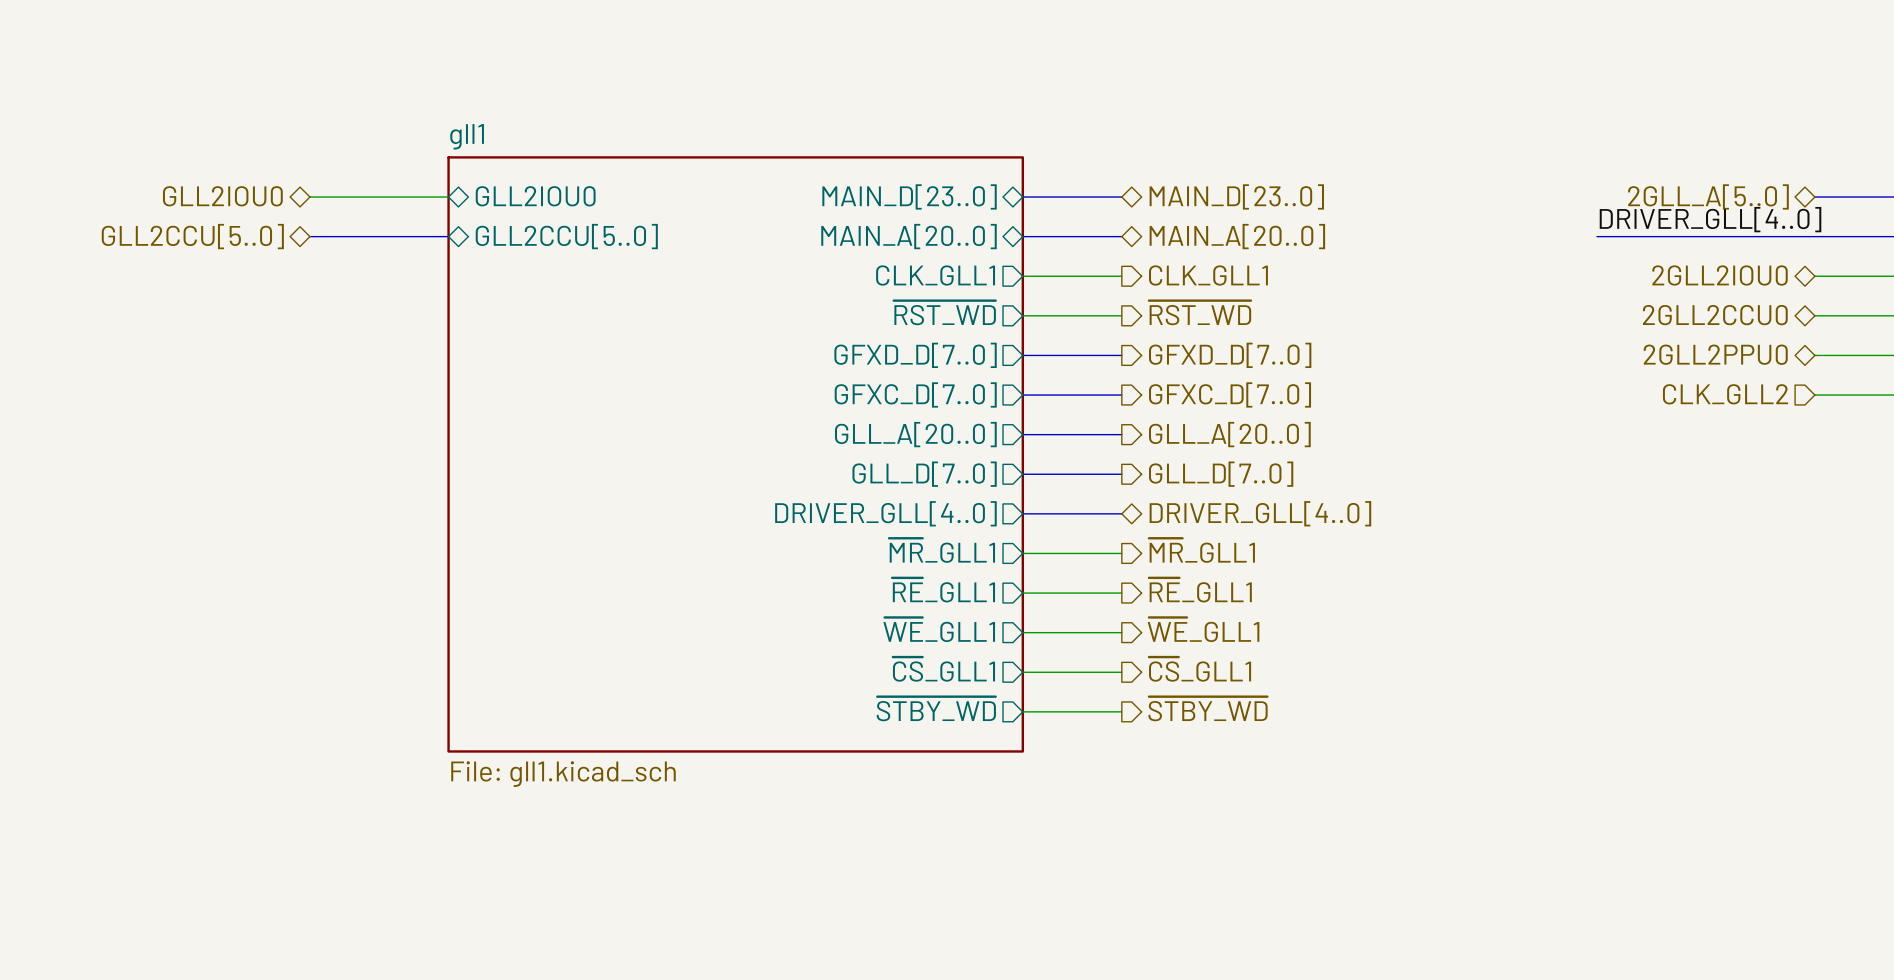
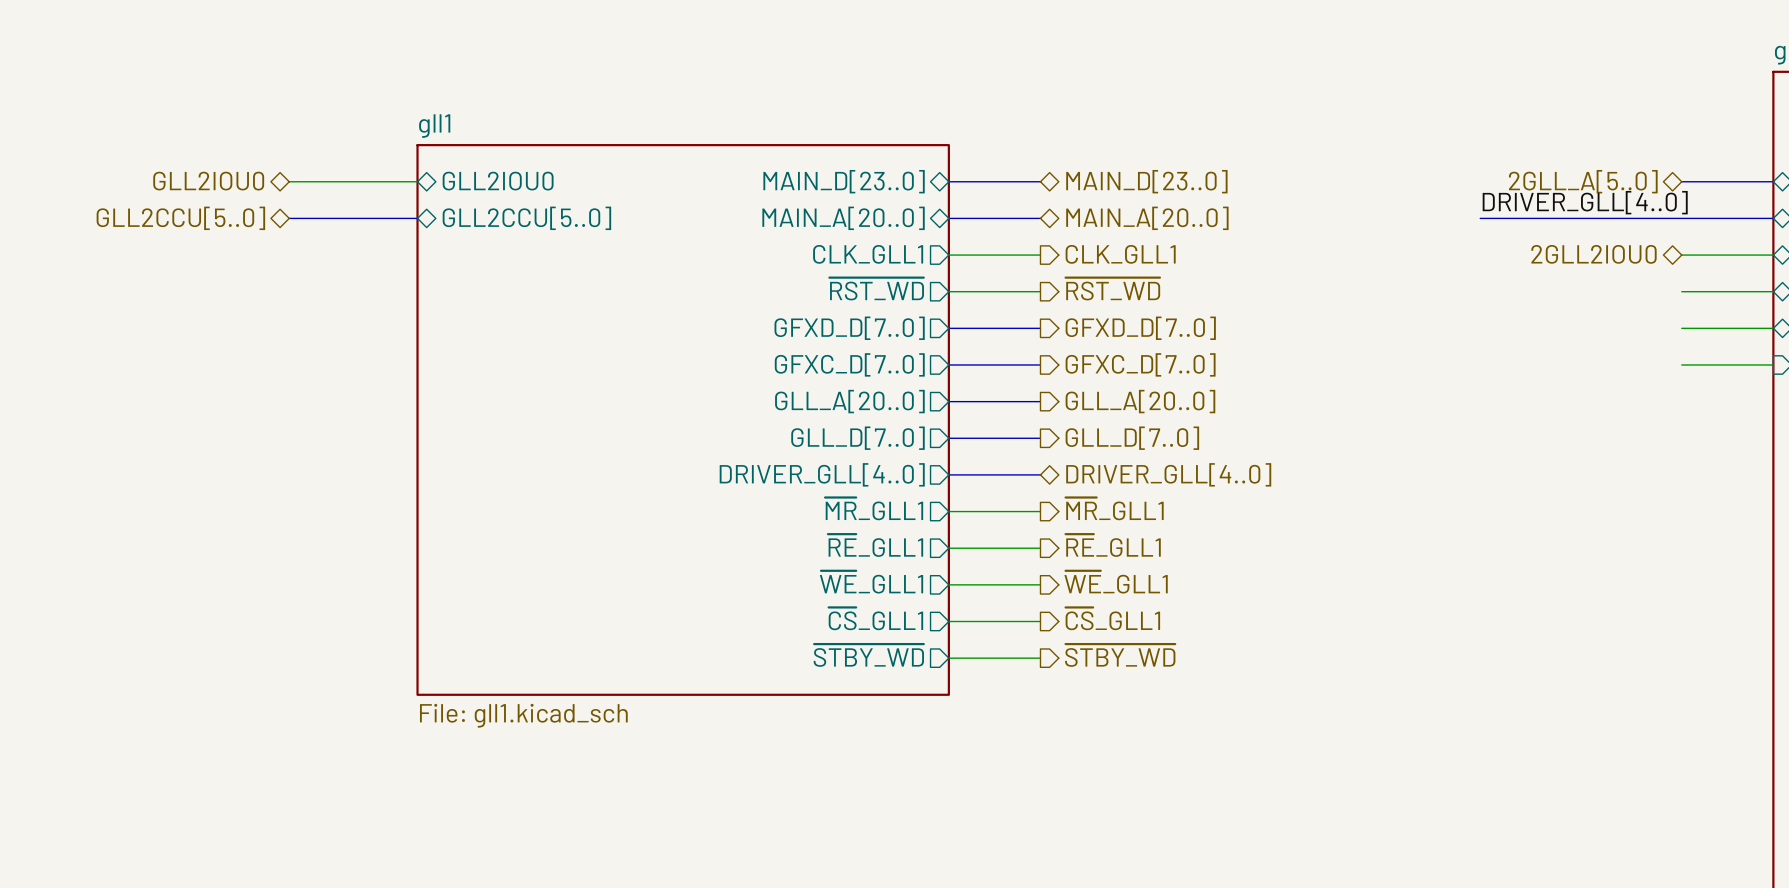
hierarchical label: 2GLL2CCU0 (1715, 315) -> none
hierarchical label: 2GLL2PPU0 (1715, 354) -> none
hierarchical label: CLK_GLL2 (1725, 394) -> none

